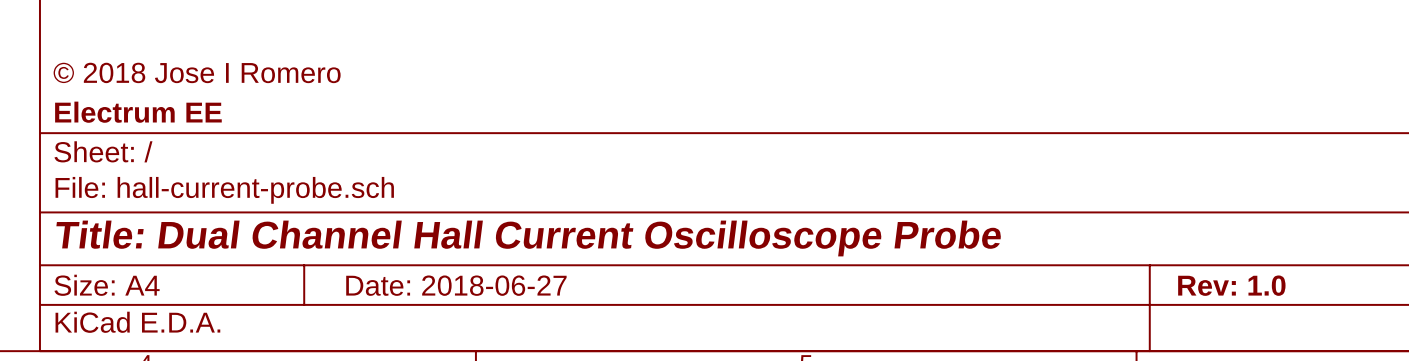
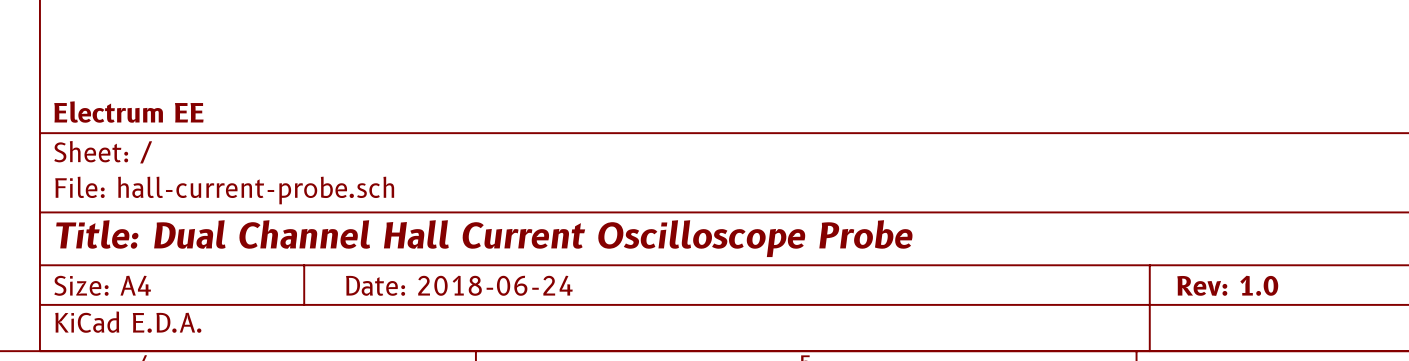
title block: © 2018 Jose I Romero (197, 72) -> none
title block: Date: 2018-06-27 (456, 285) -> Date: 2018-06-24 (459, 285)

